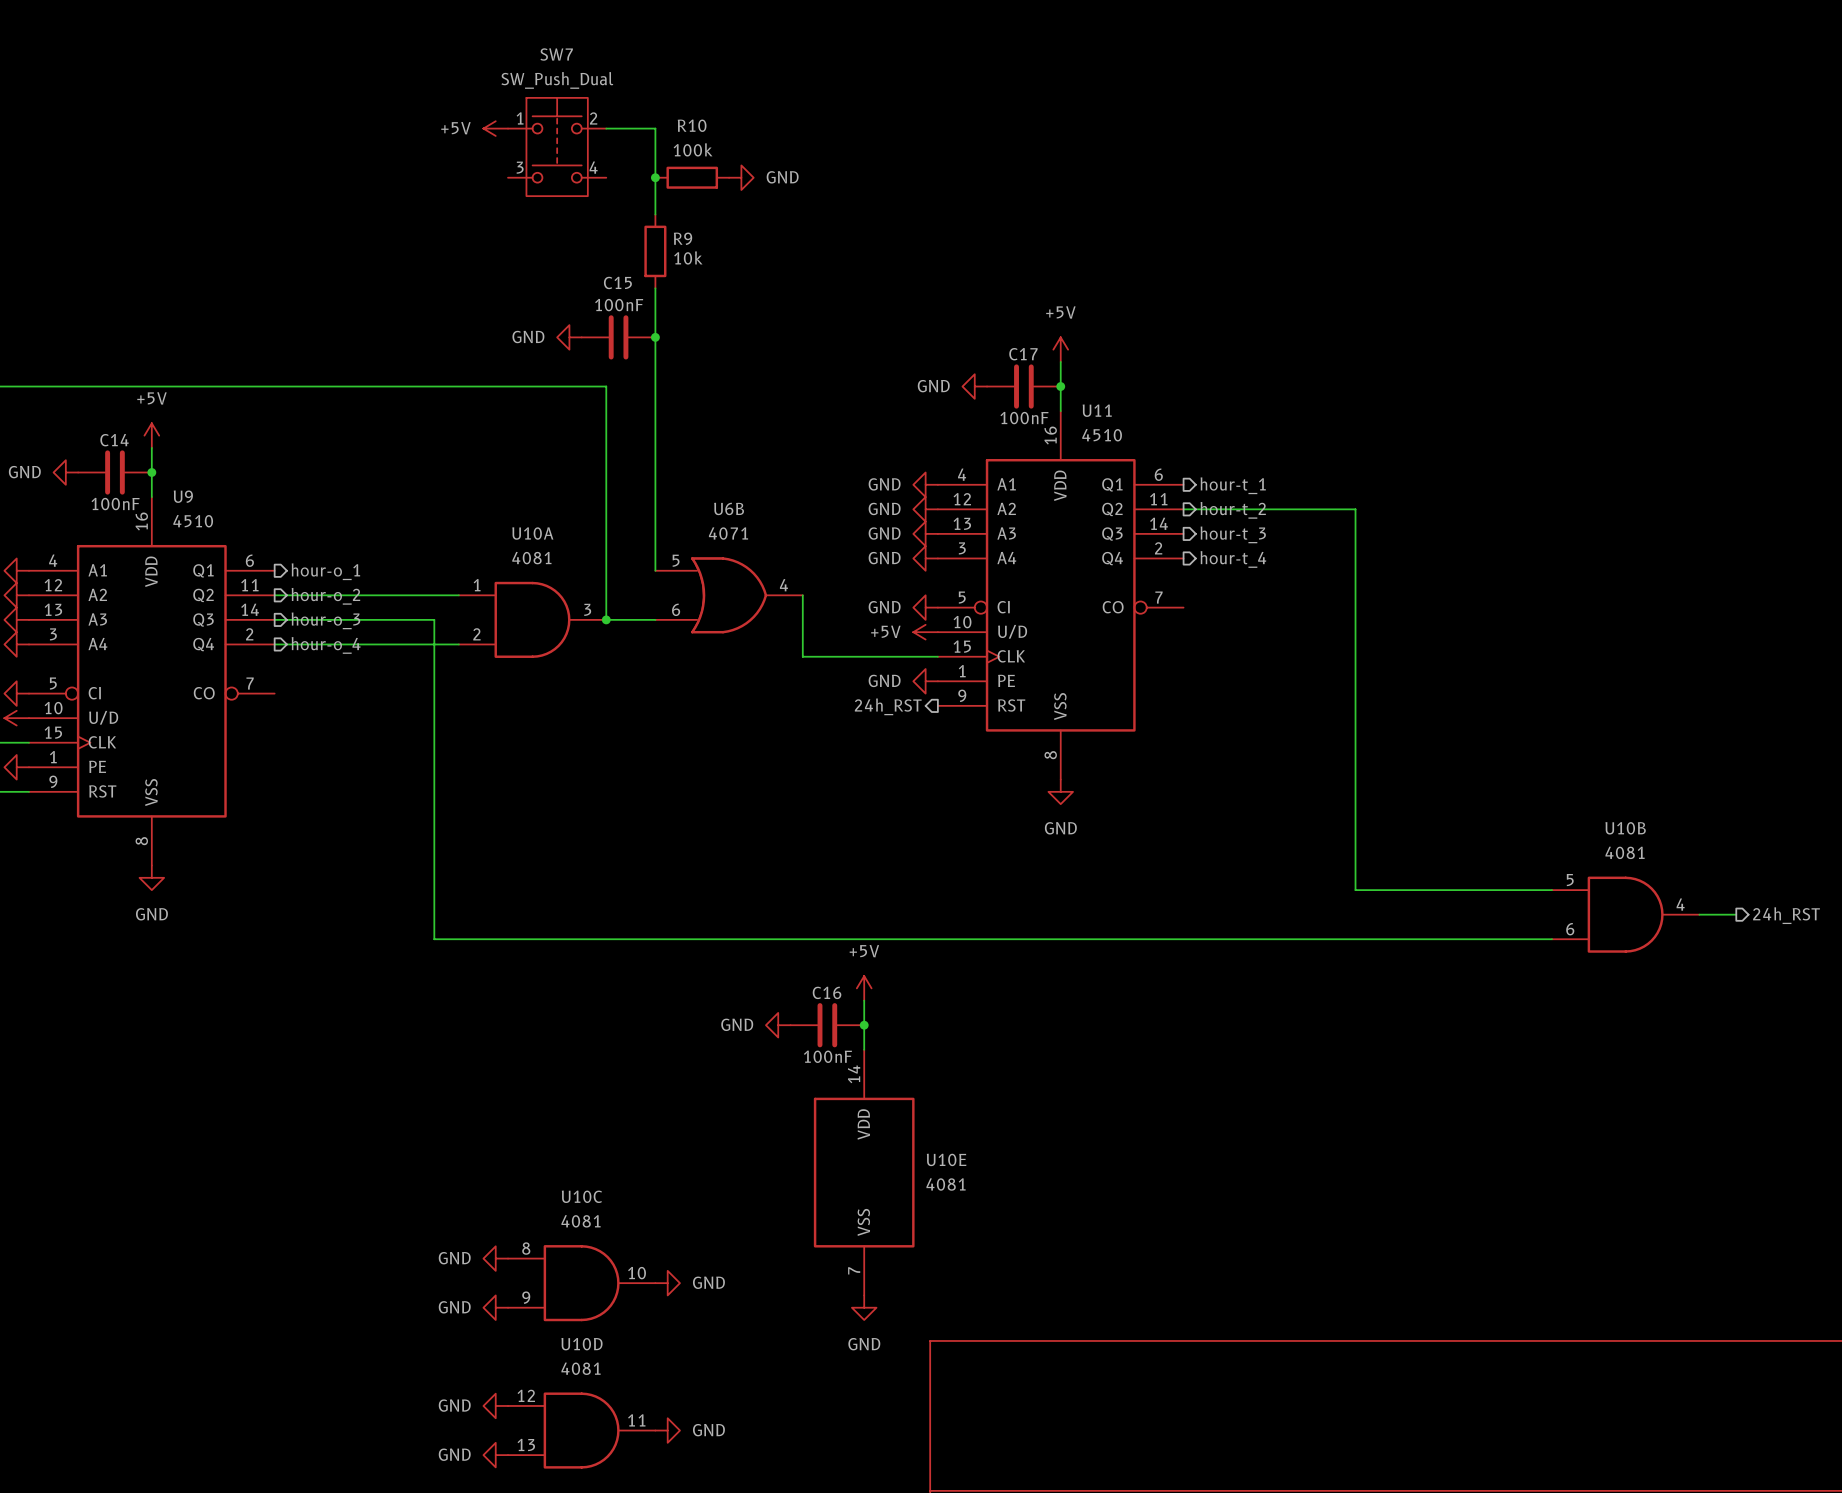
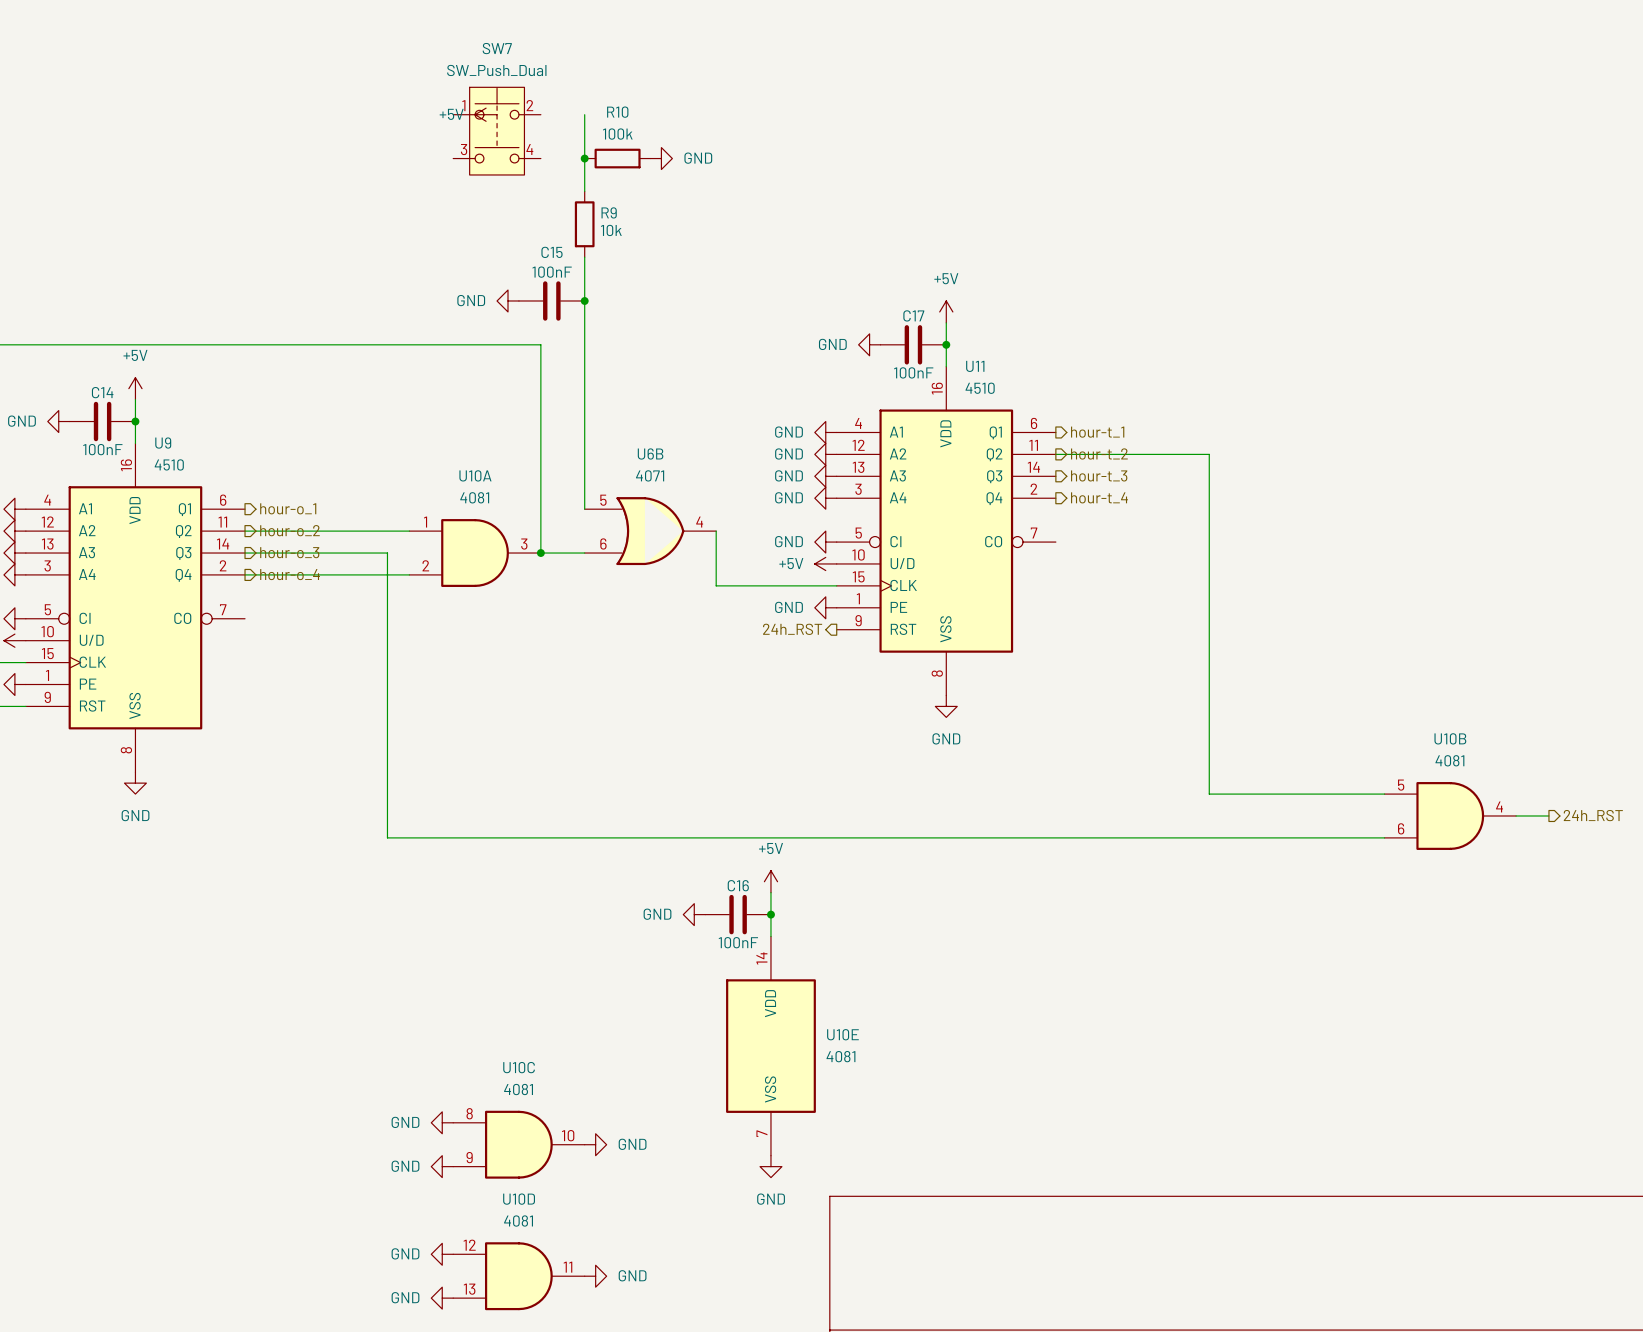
power symbol position: +5V (495, 128) -> +5V (486, 114)
wire: (606, 128) (655, 128) -> none

